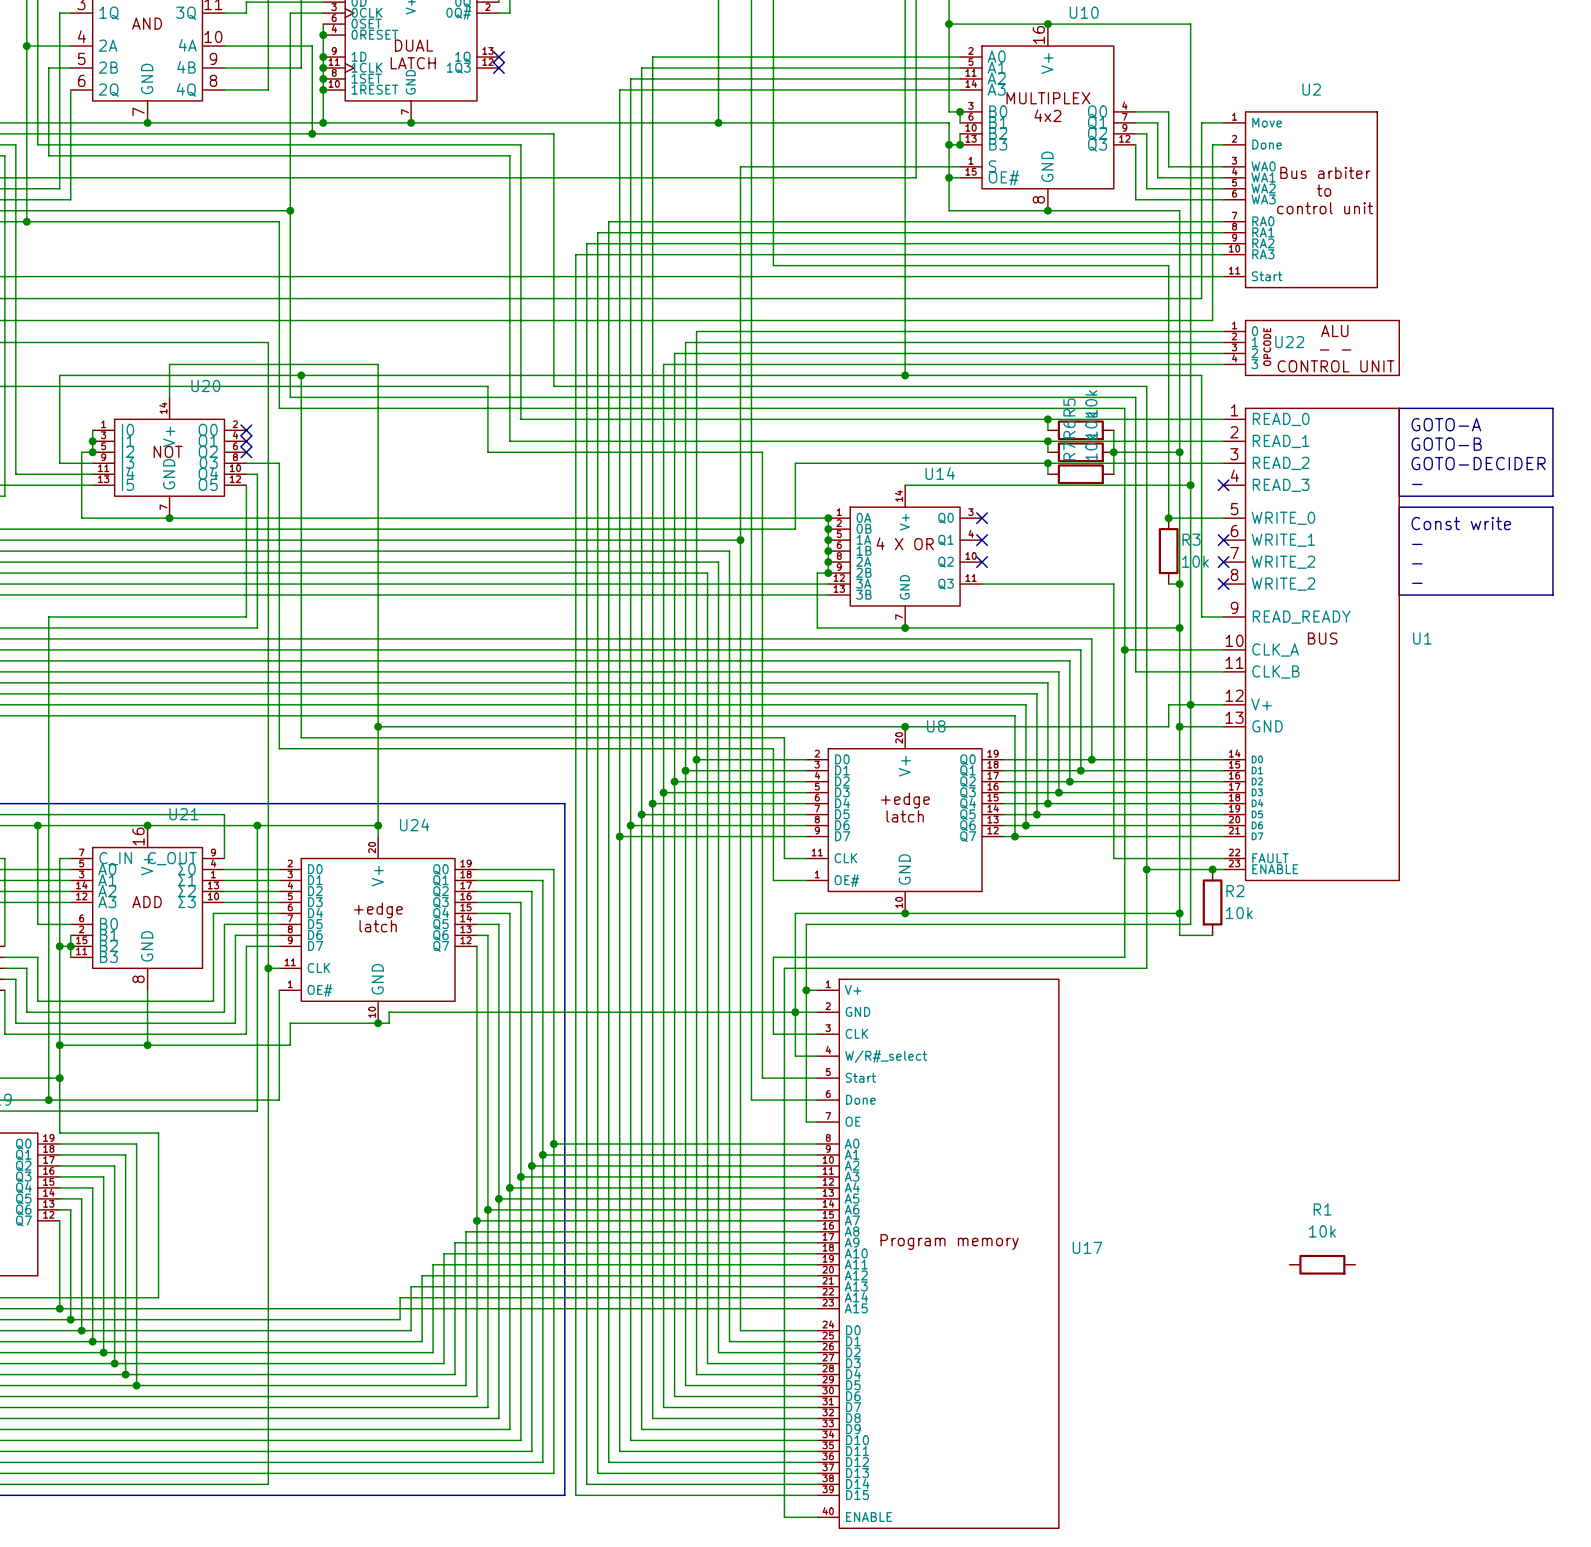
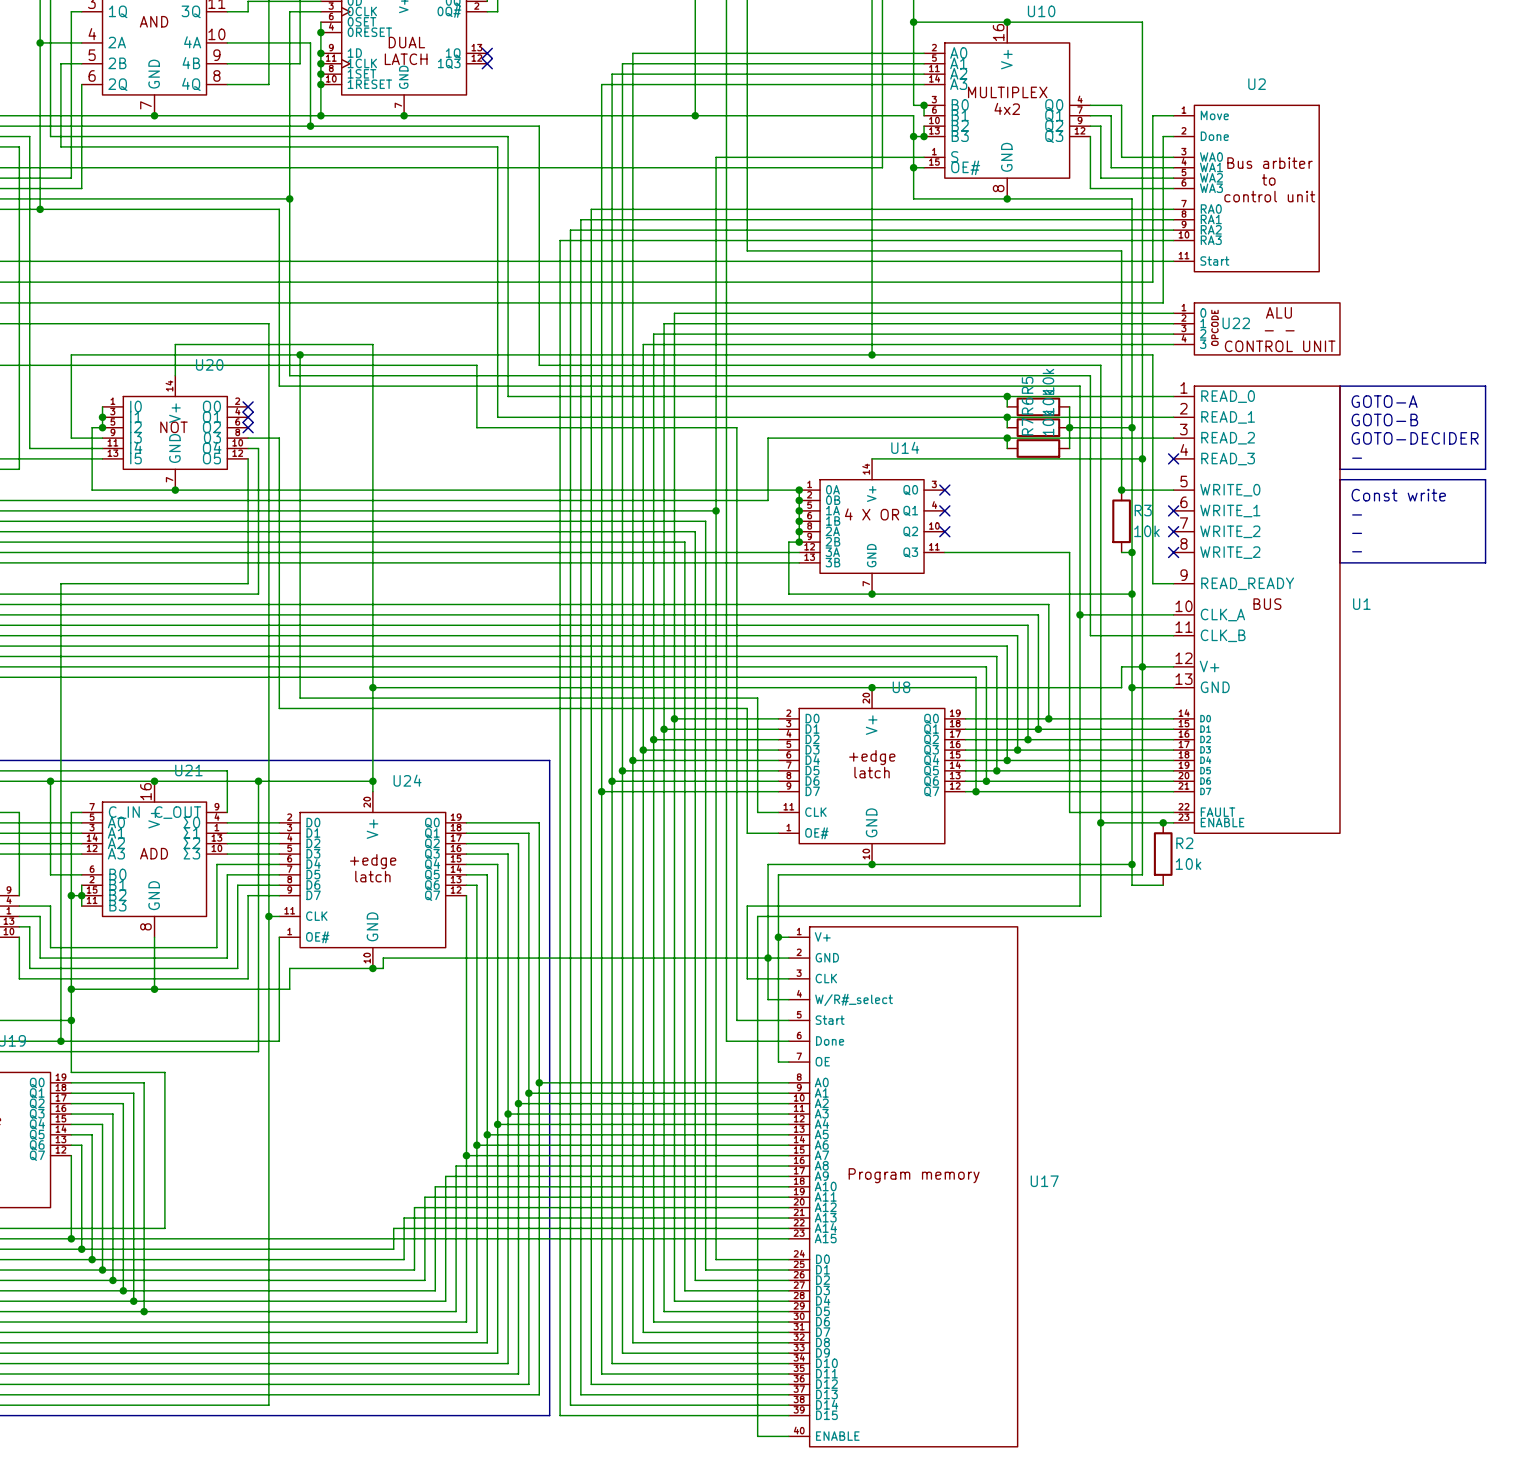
R1: 10k (1322, 1264) -> none

